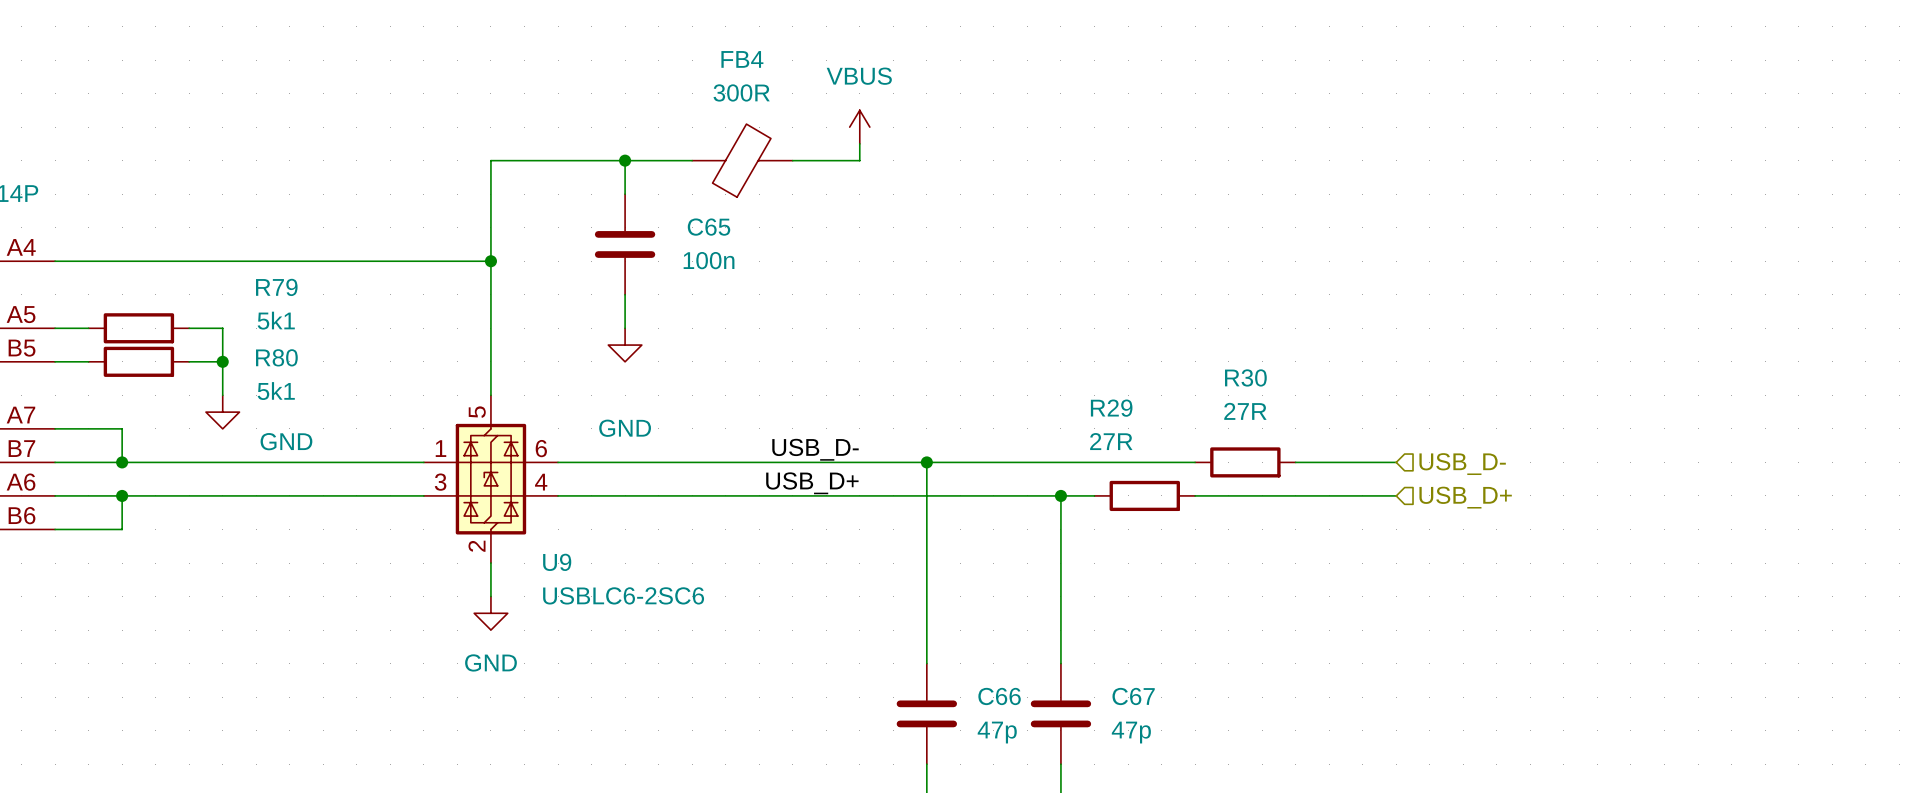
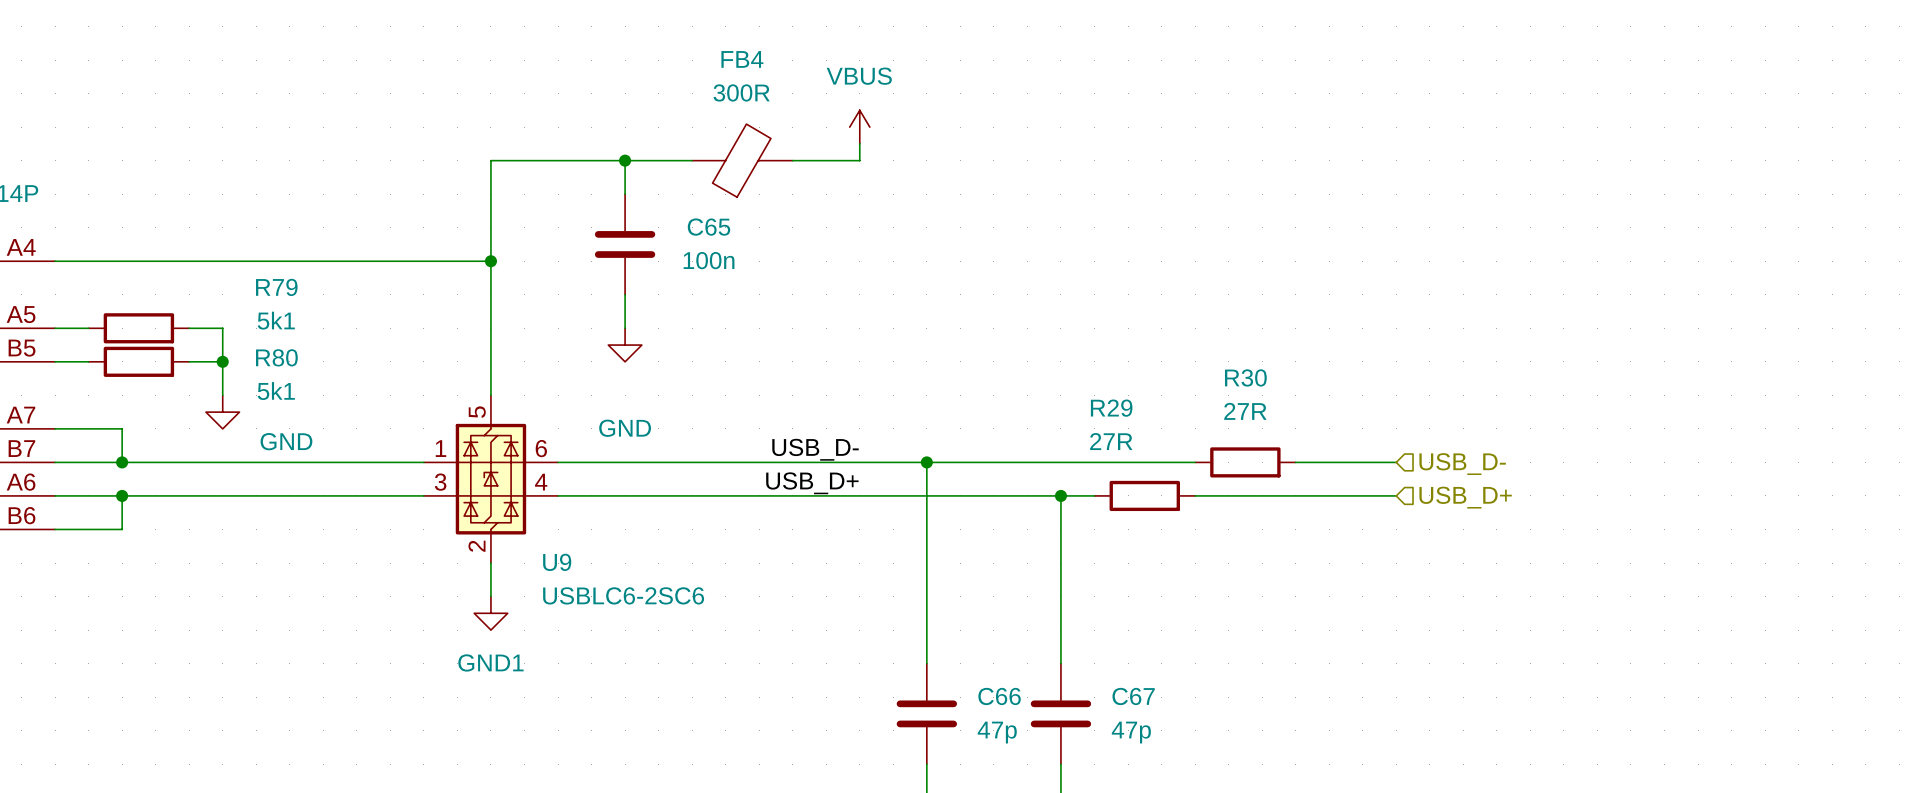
power symbol: GND (490, 613) -> GND1 (490, 613)

